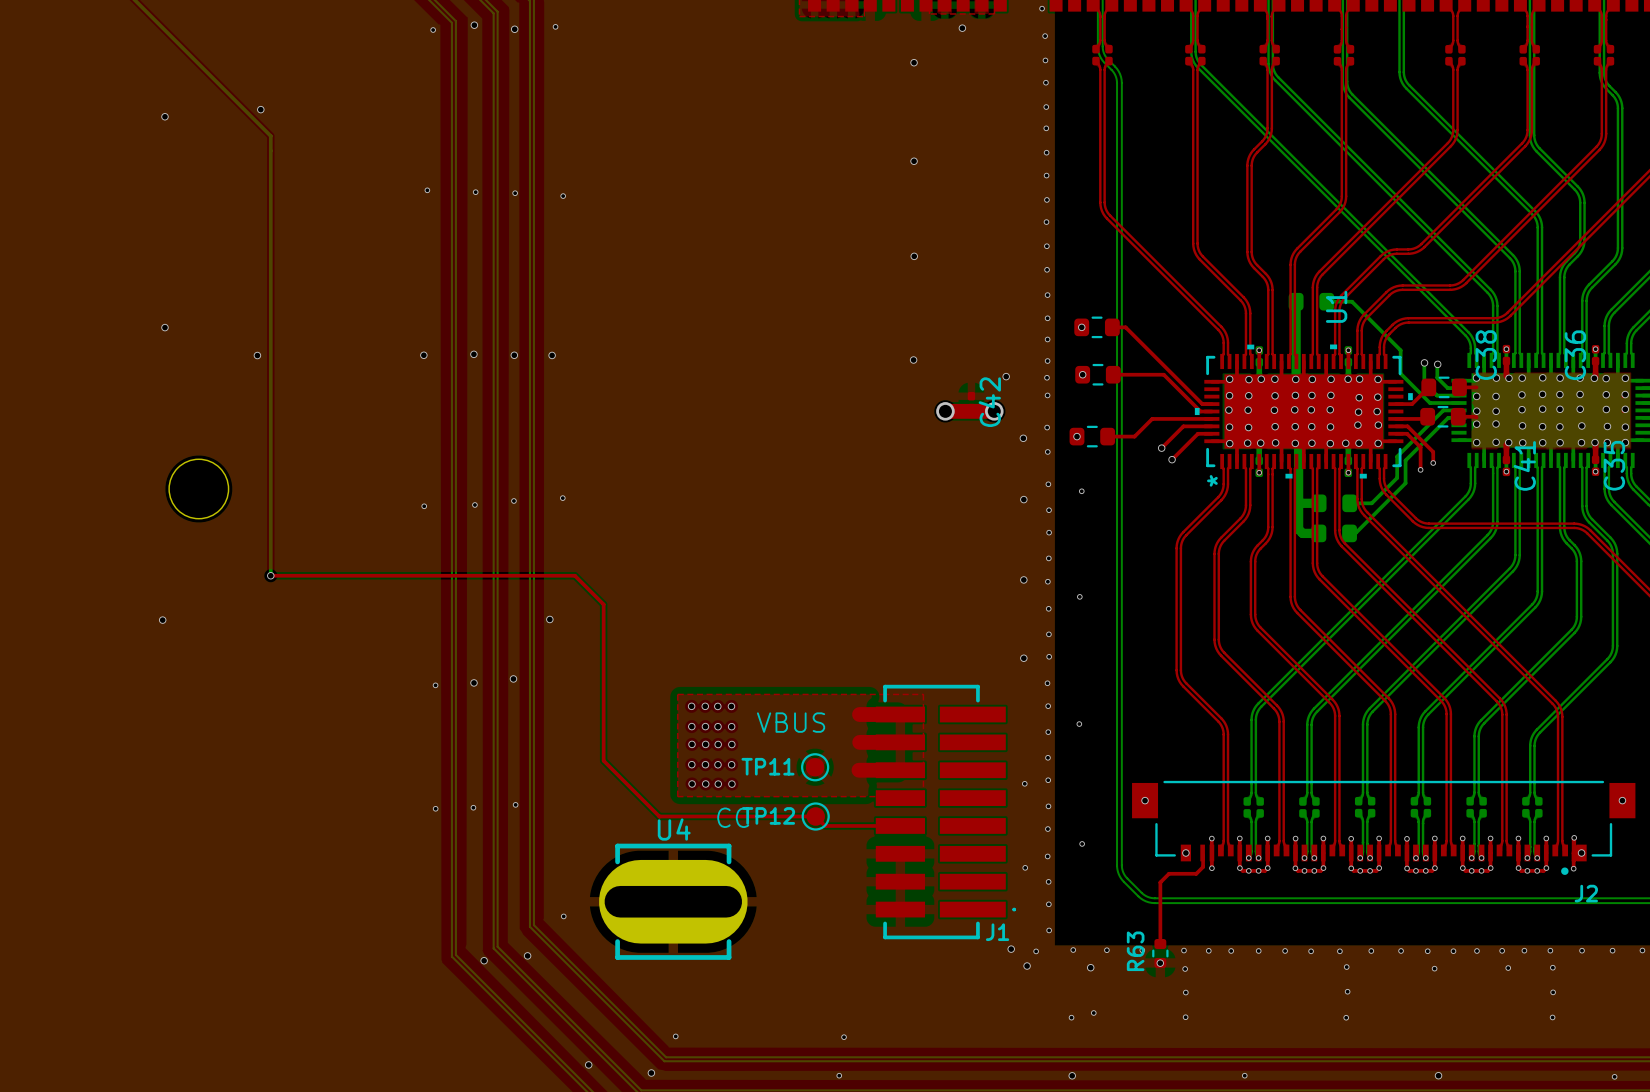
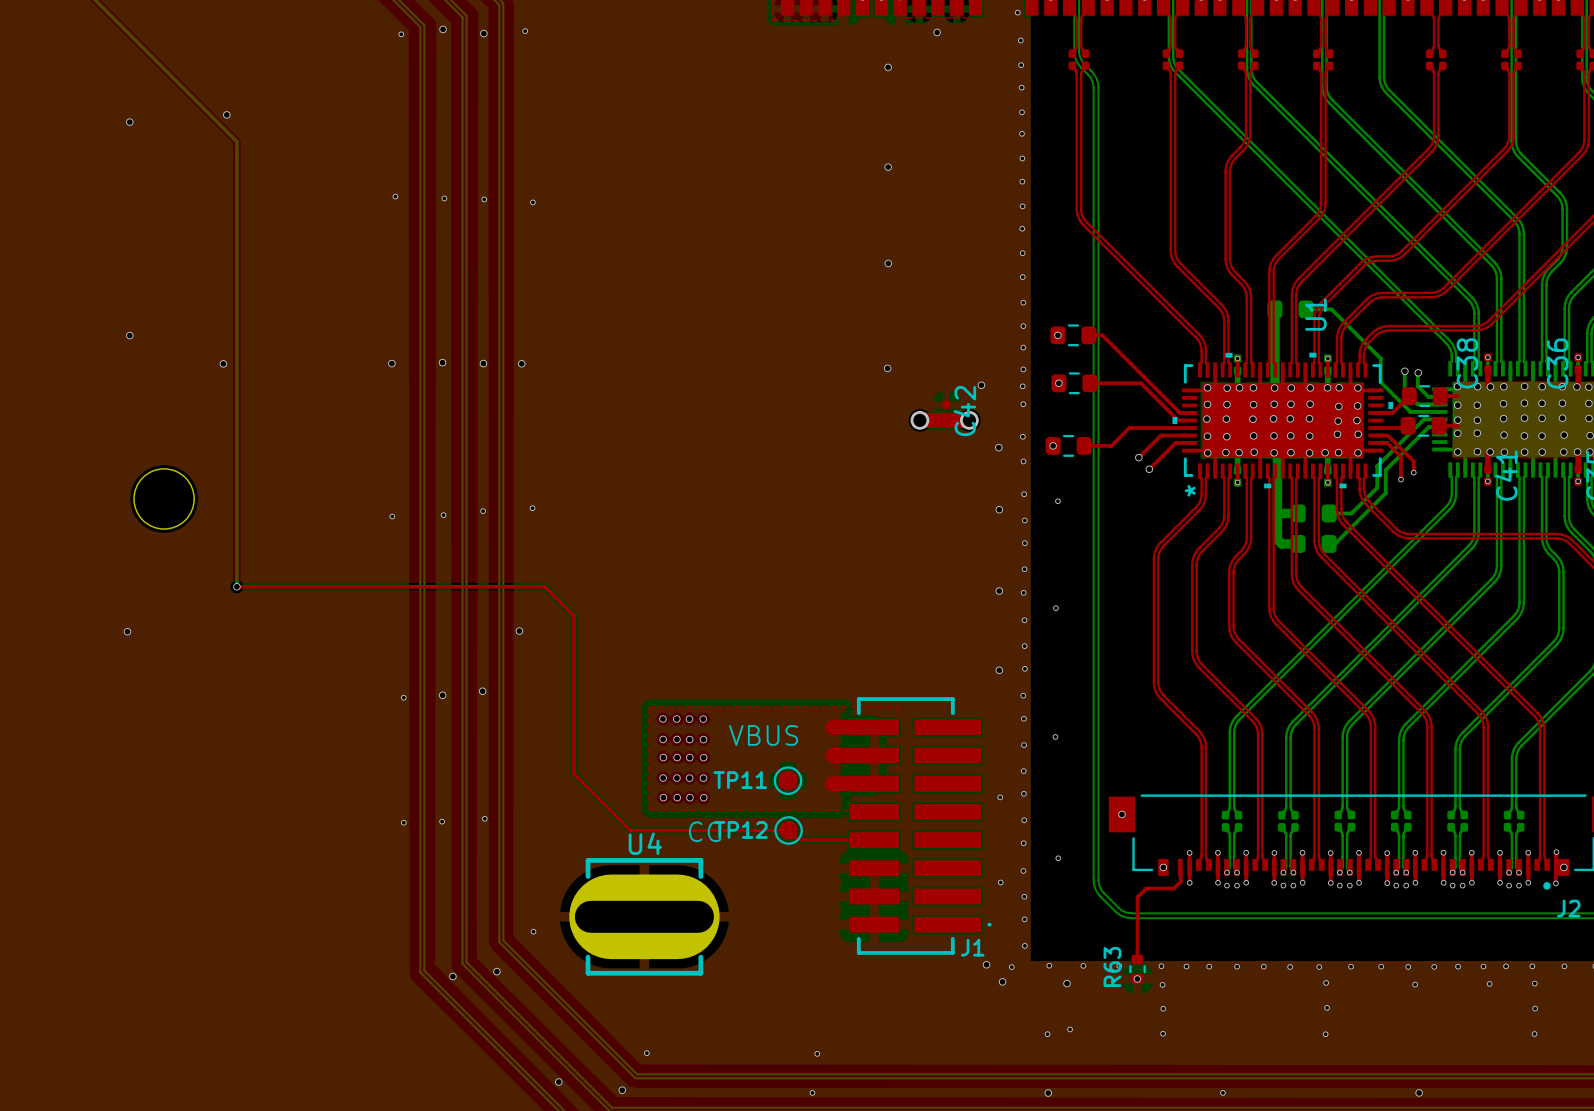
top track: (1239, 867) (1242, 870) (1264, 870) (1267, 867) -> none
top track: (1351, 867) (1353, 870) (1376, 870) (1379, 868) -> none
top track: (1406, 867) (1409, 870) (1432, 870) (1434, 868) -> none
top track: (1462, 867) (1465, 870) (1487, 870) (1490, 868) -> none
top track: (1518, 867) (1521, 870) (1543, 870) (1546, 868) -> none
top track: (1323, 868) (1320, 870) (1297, 870) (1295, 868) -> none

